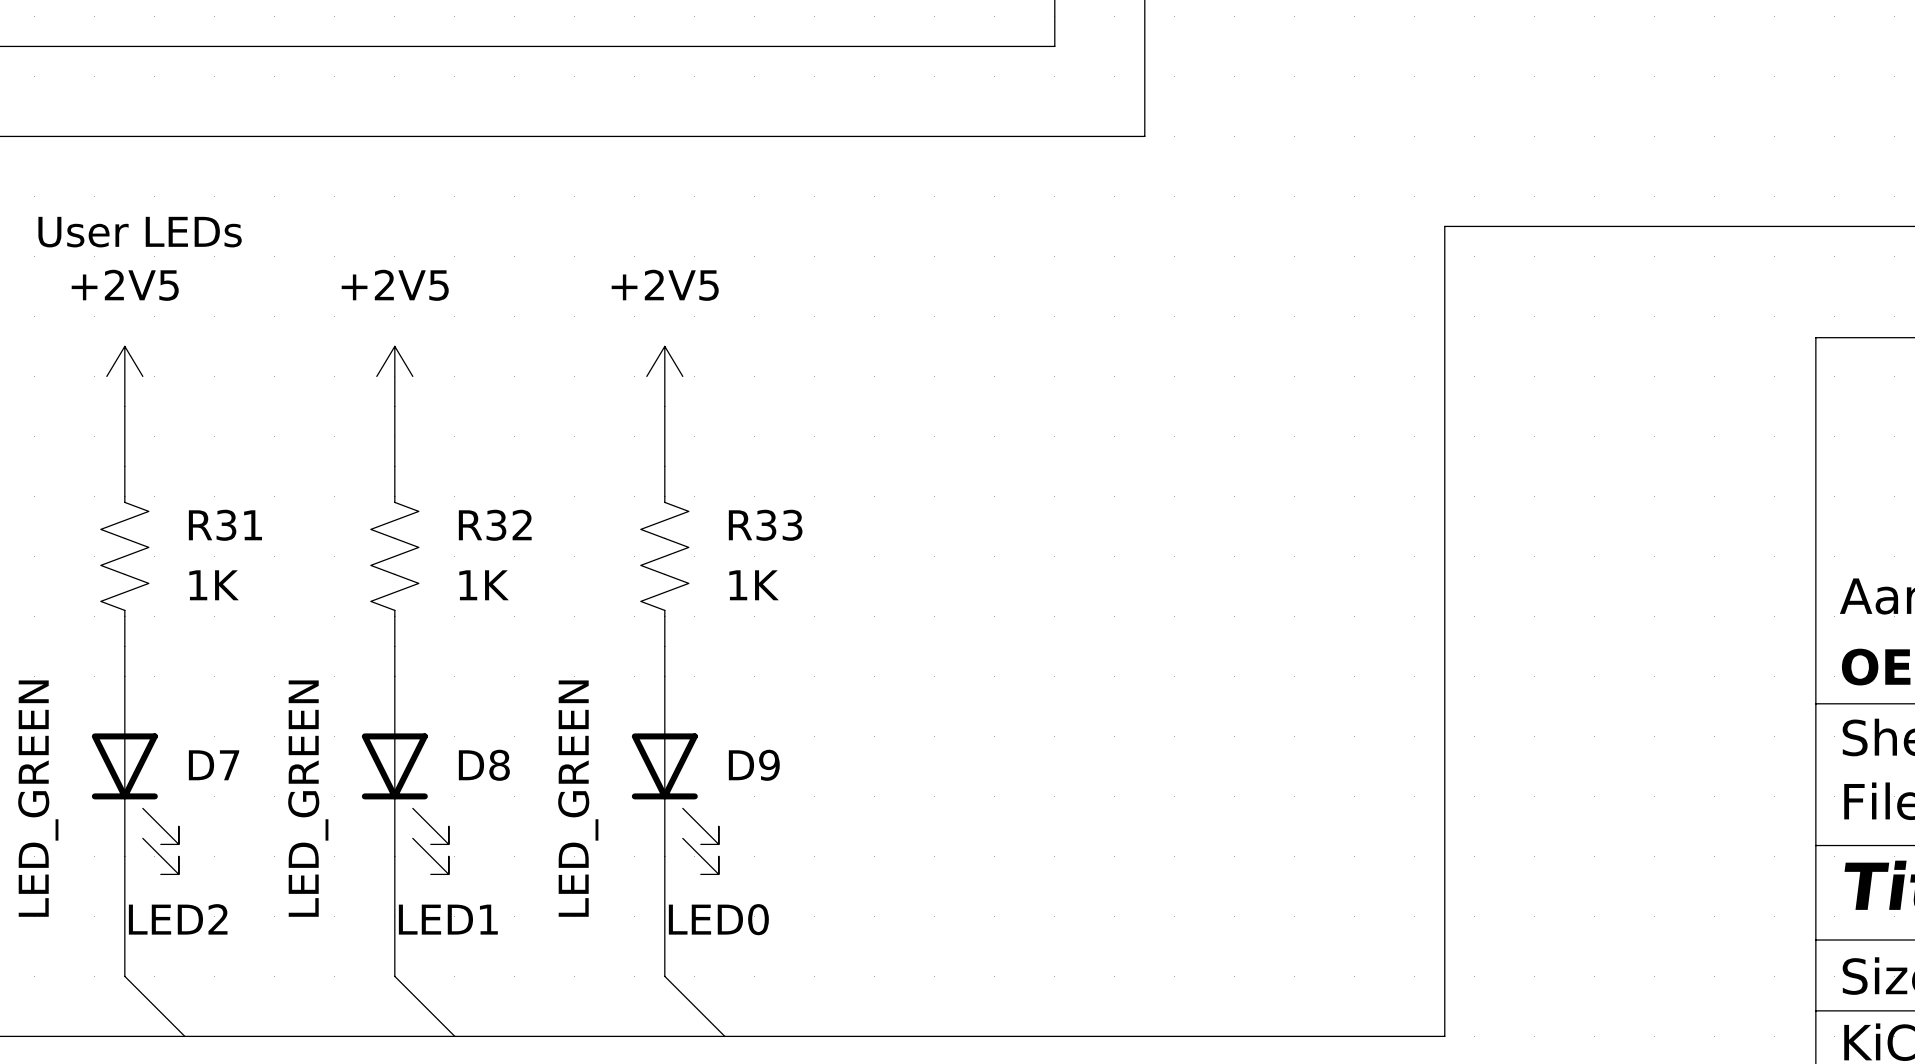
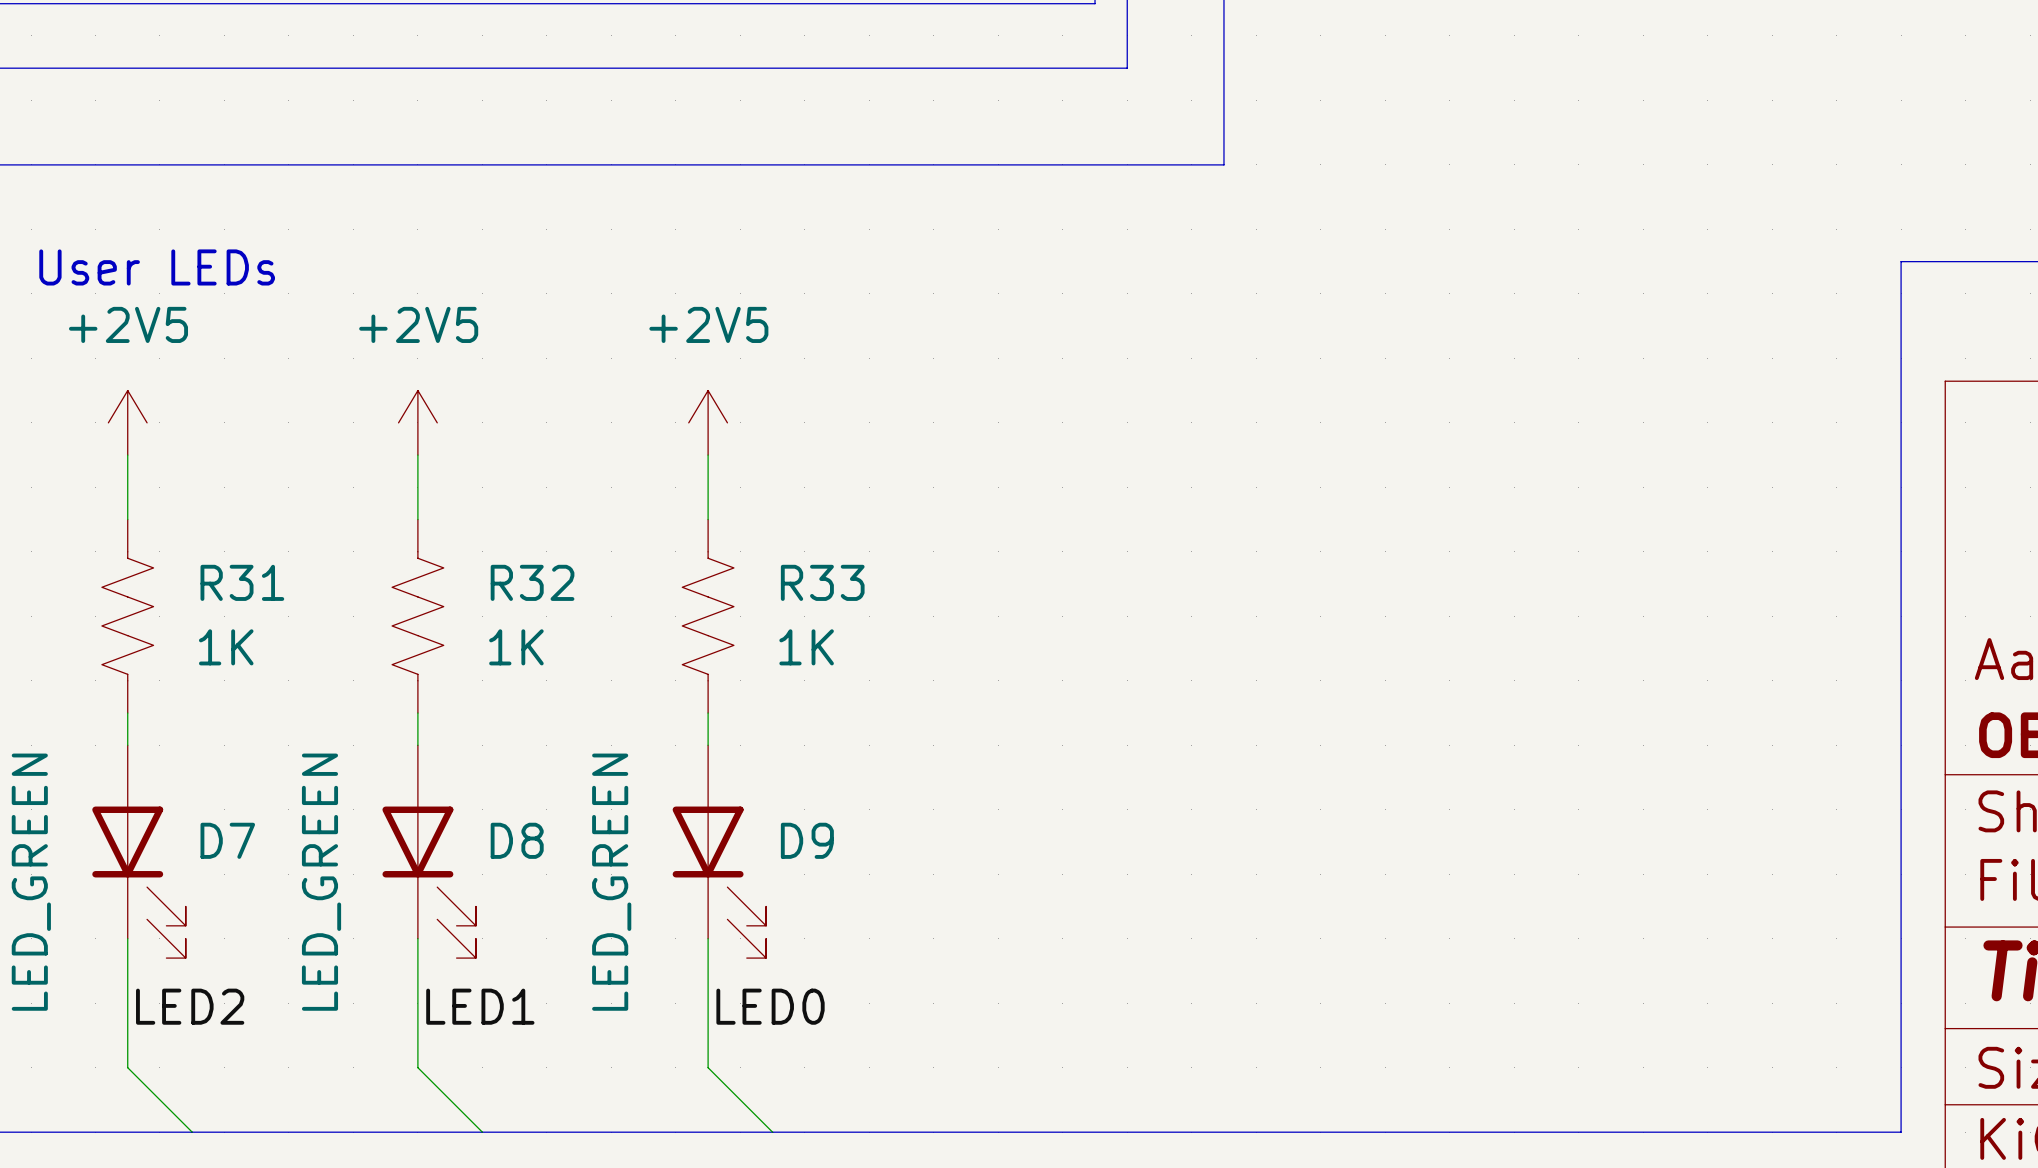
bus: (1774, 226) (1444, 226) (1444, 1036) -> (1901, 261) (1901, 1132) (1546, 1132)

